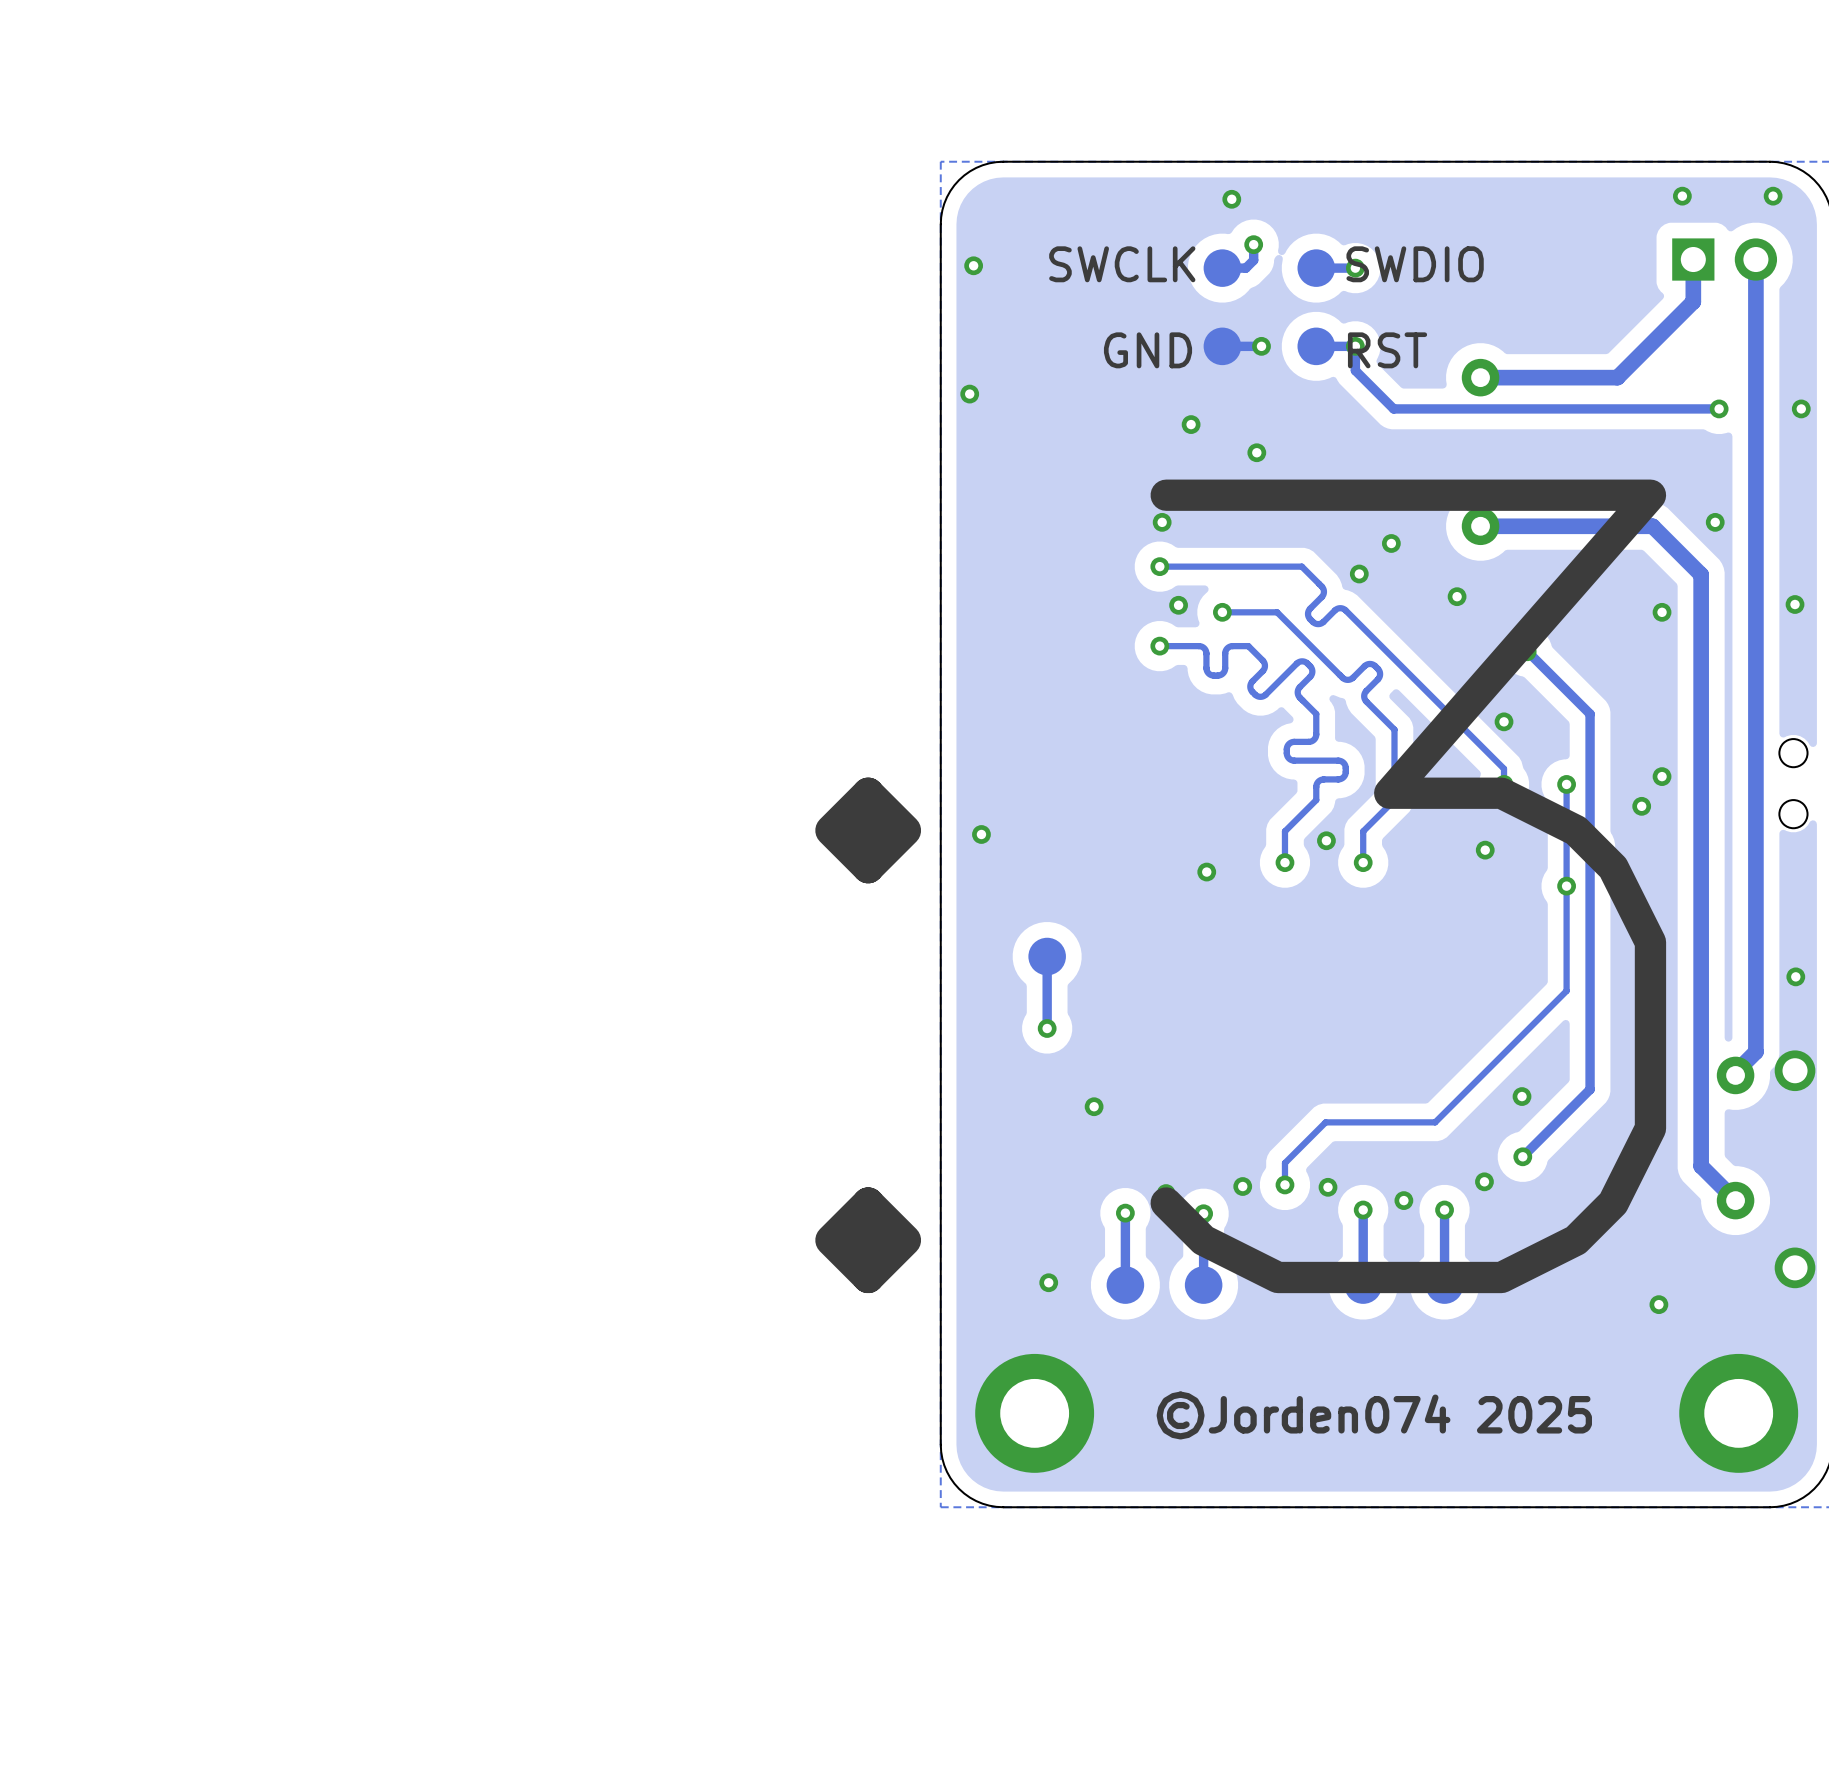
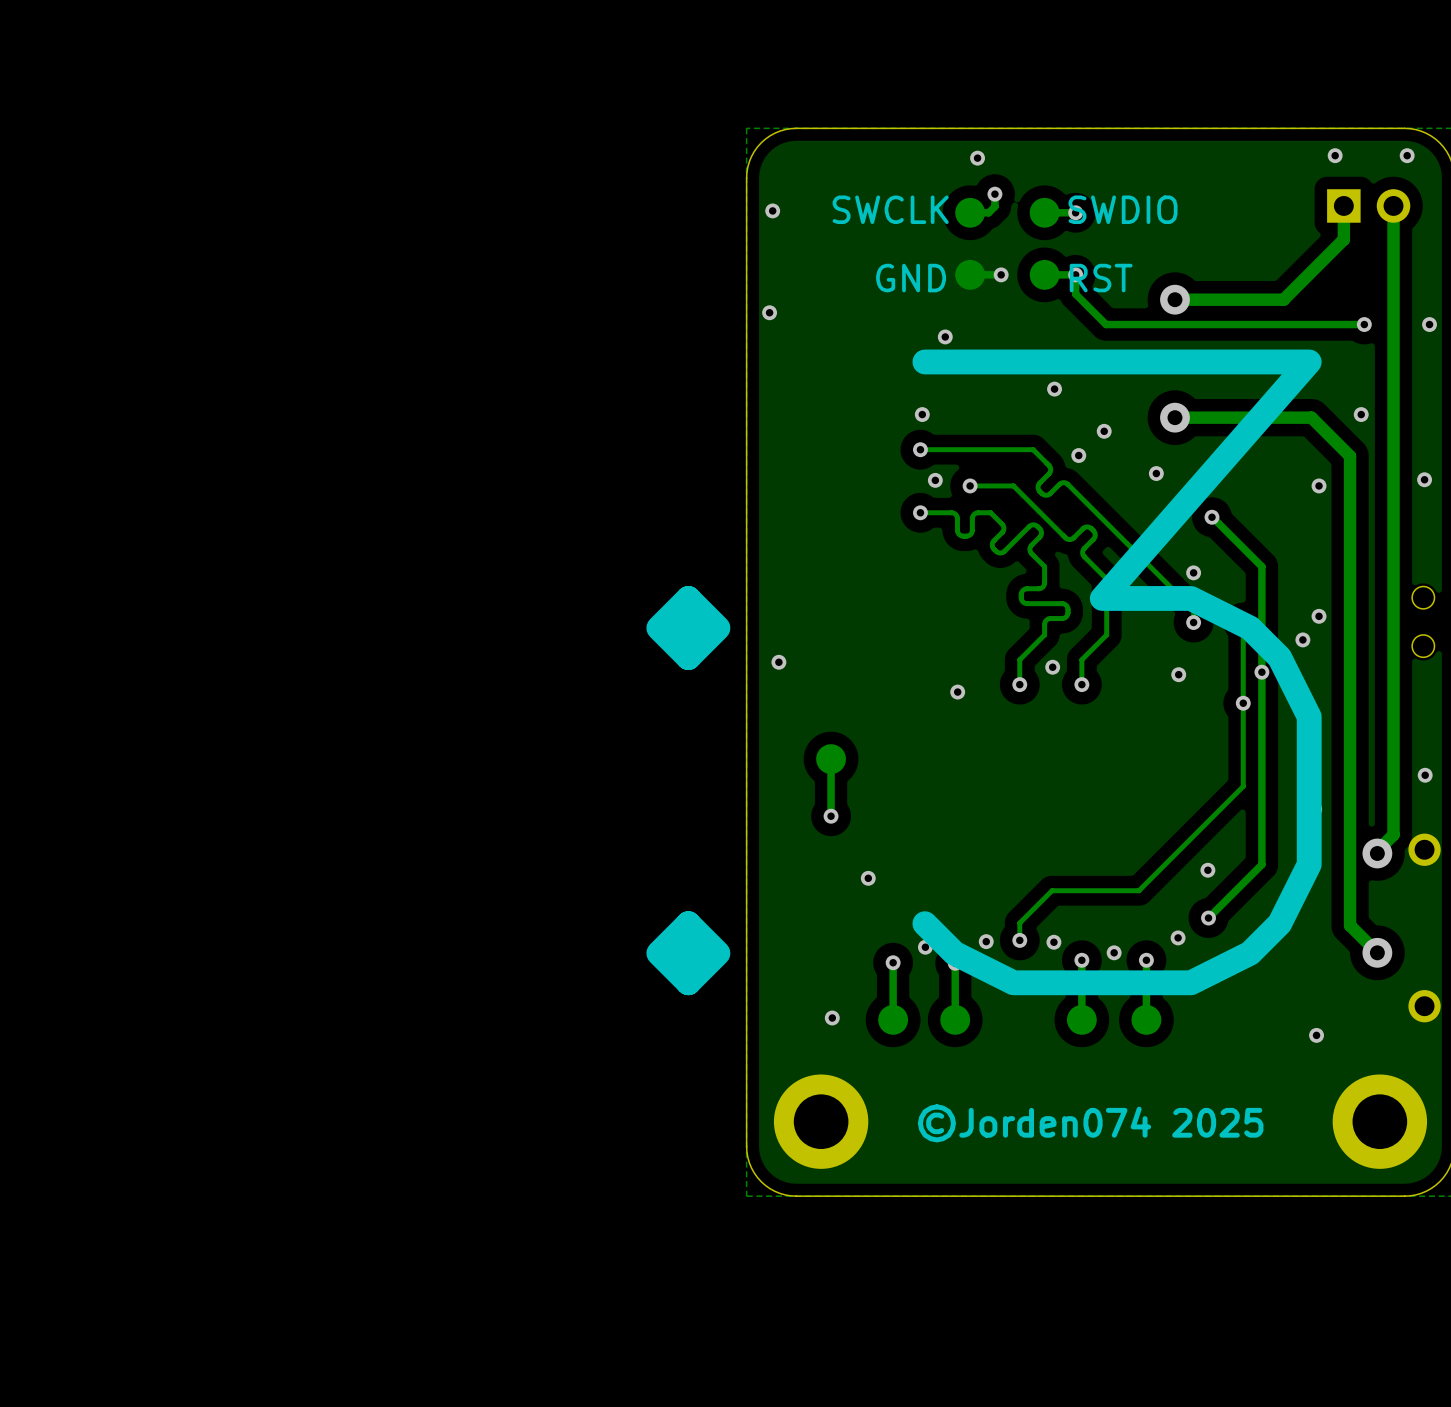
text position: :3 (1240, 886) -> :3 (984, 672)

